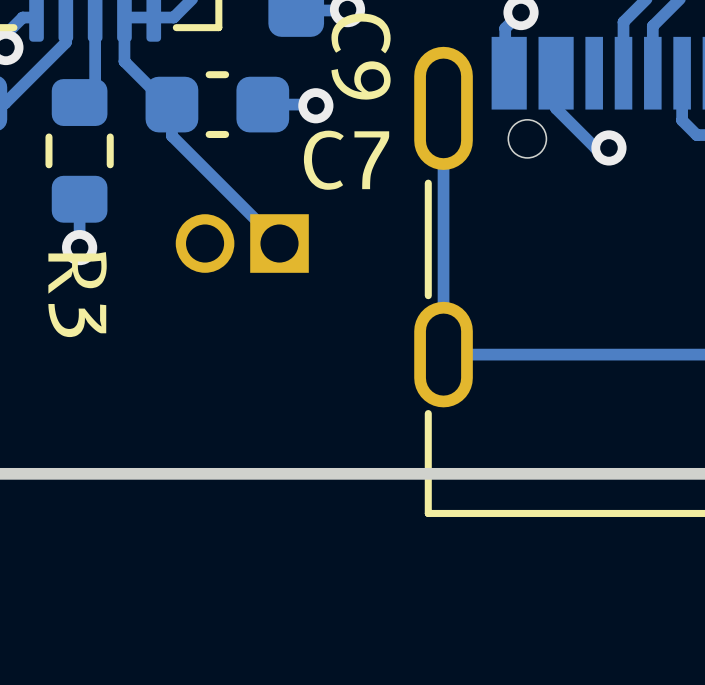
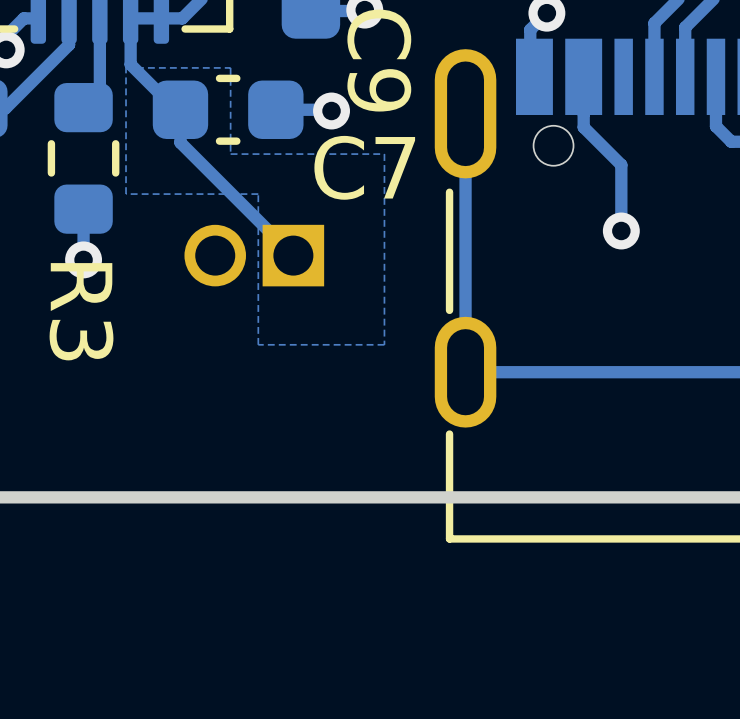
zone outline: none -> (230, 67) (126, 67) (126, 194) (258, 194) (258, 344) (384, 344) (384, 154) (230, 154) (230, 67)
track: (556, 108) (595, 147) (608, 147) -> (583, 113) (583, 127) (621, 164) (621, 230)
via position: (608, 147) -> (621, 230)

